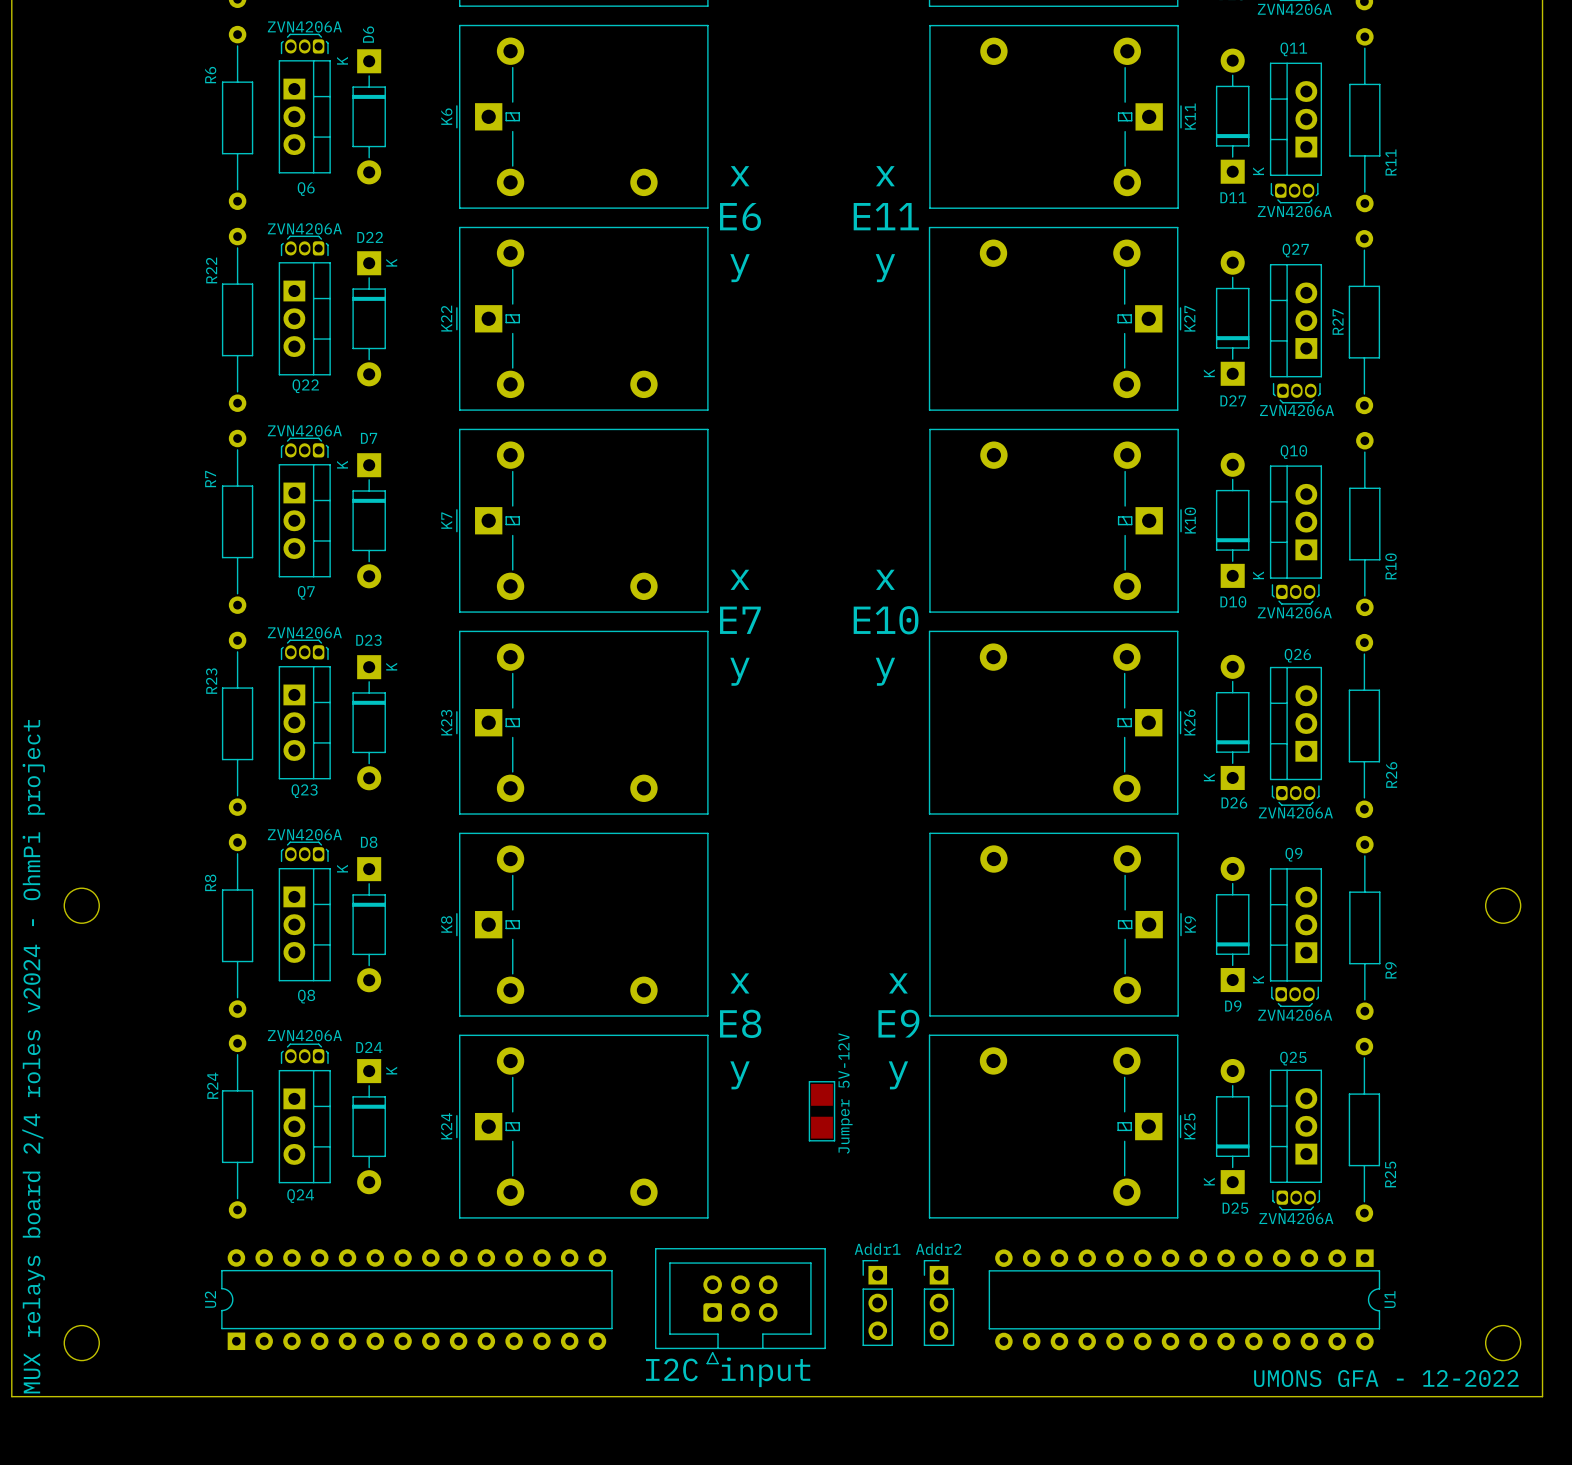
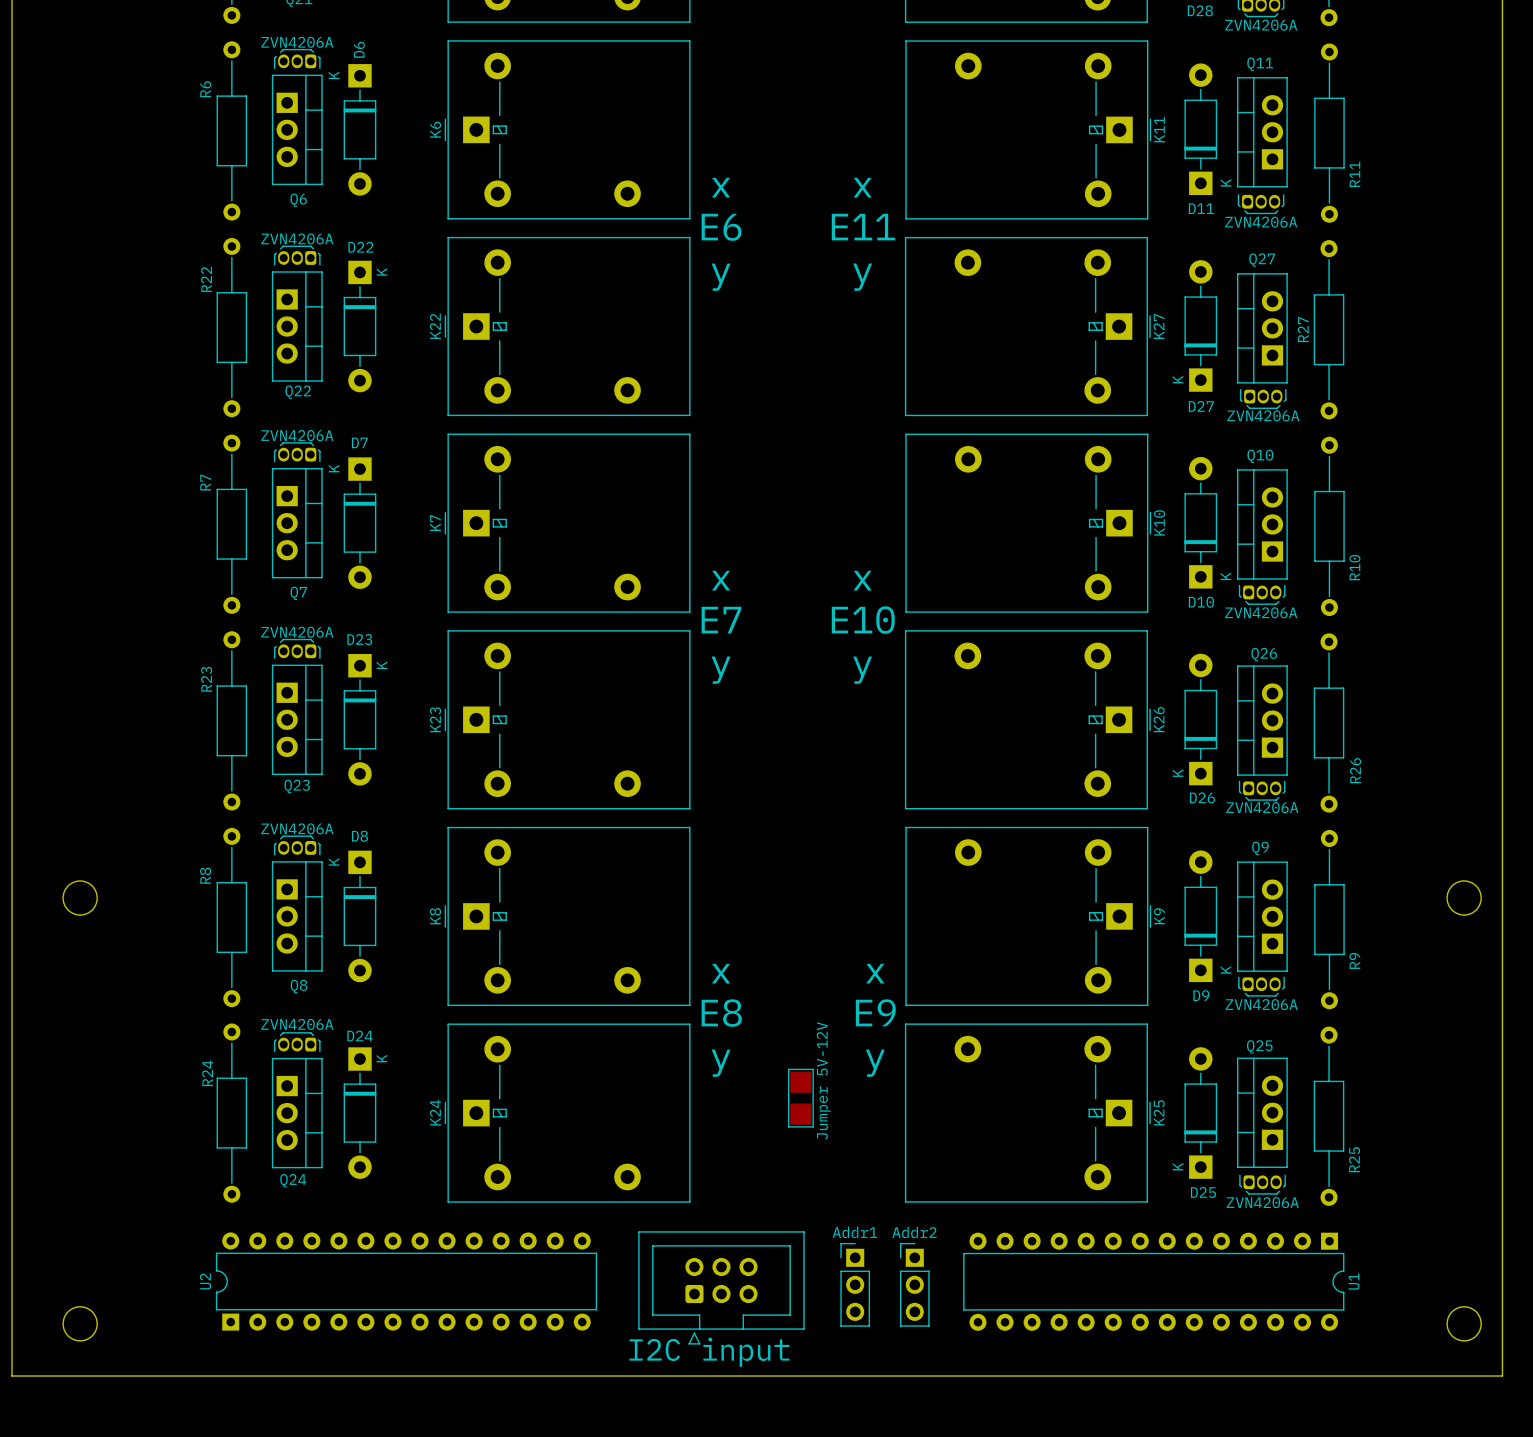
text: MUX relays board 2/4 roles v2024 - OhmPi project (33, 1056) -> none
text: UMONS GFA - 12-2022 (1386, 1378) -> none

